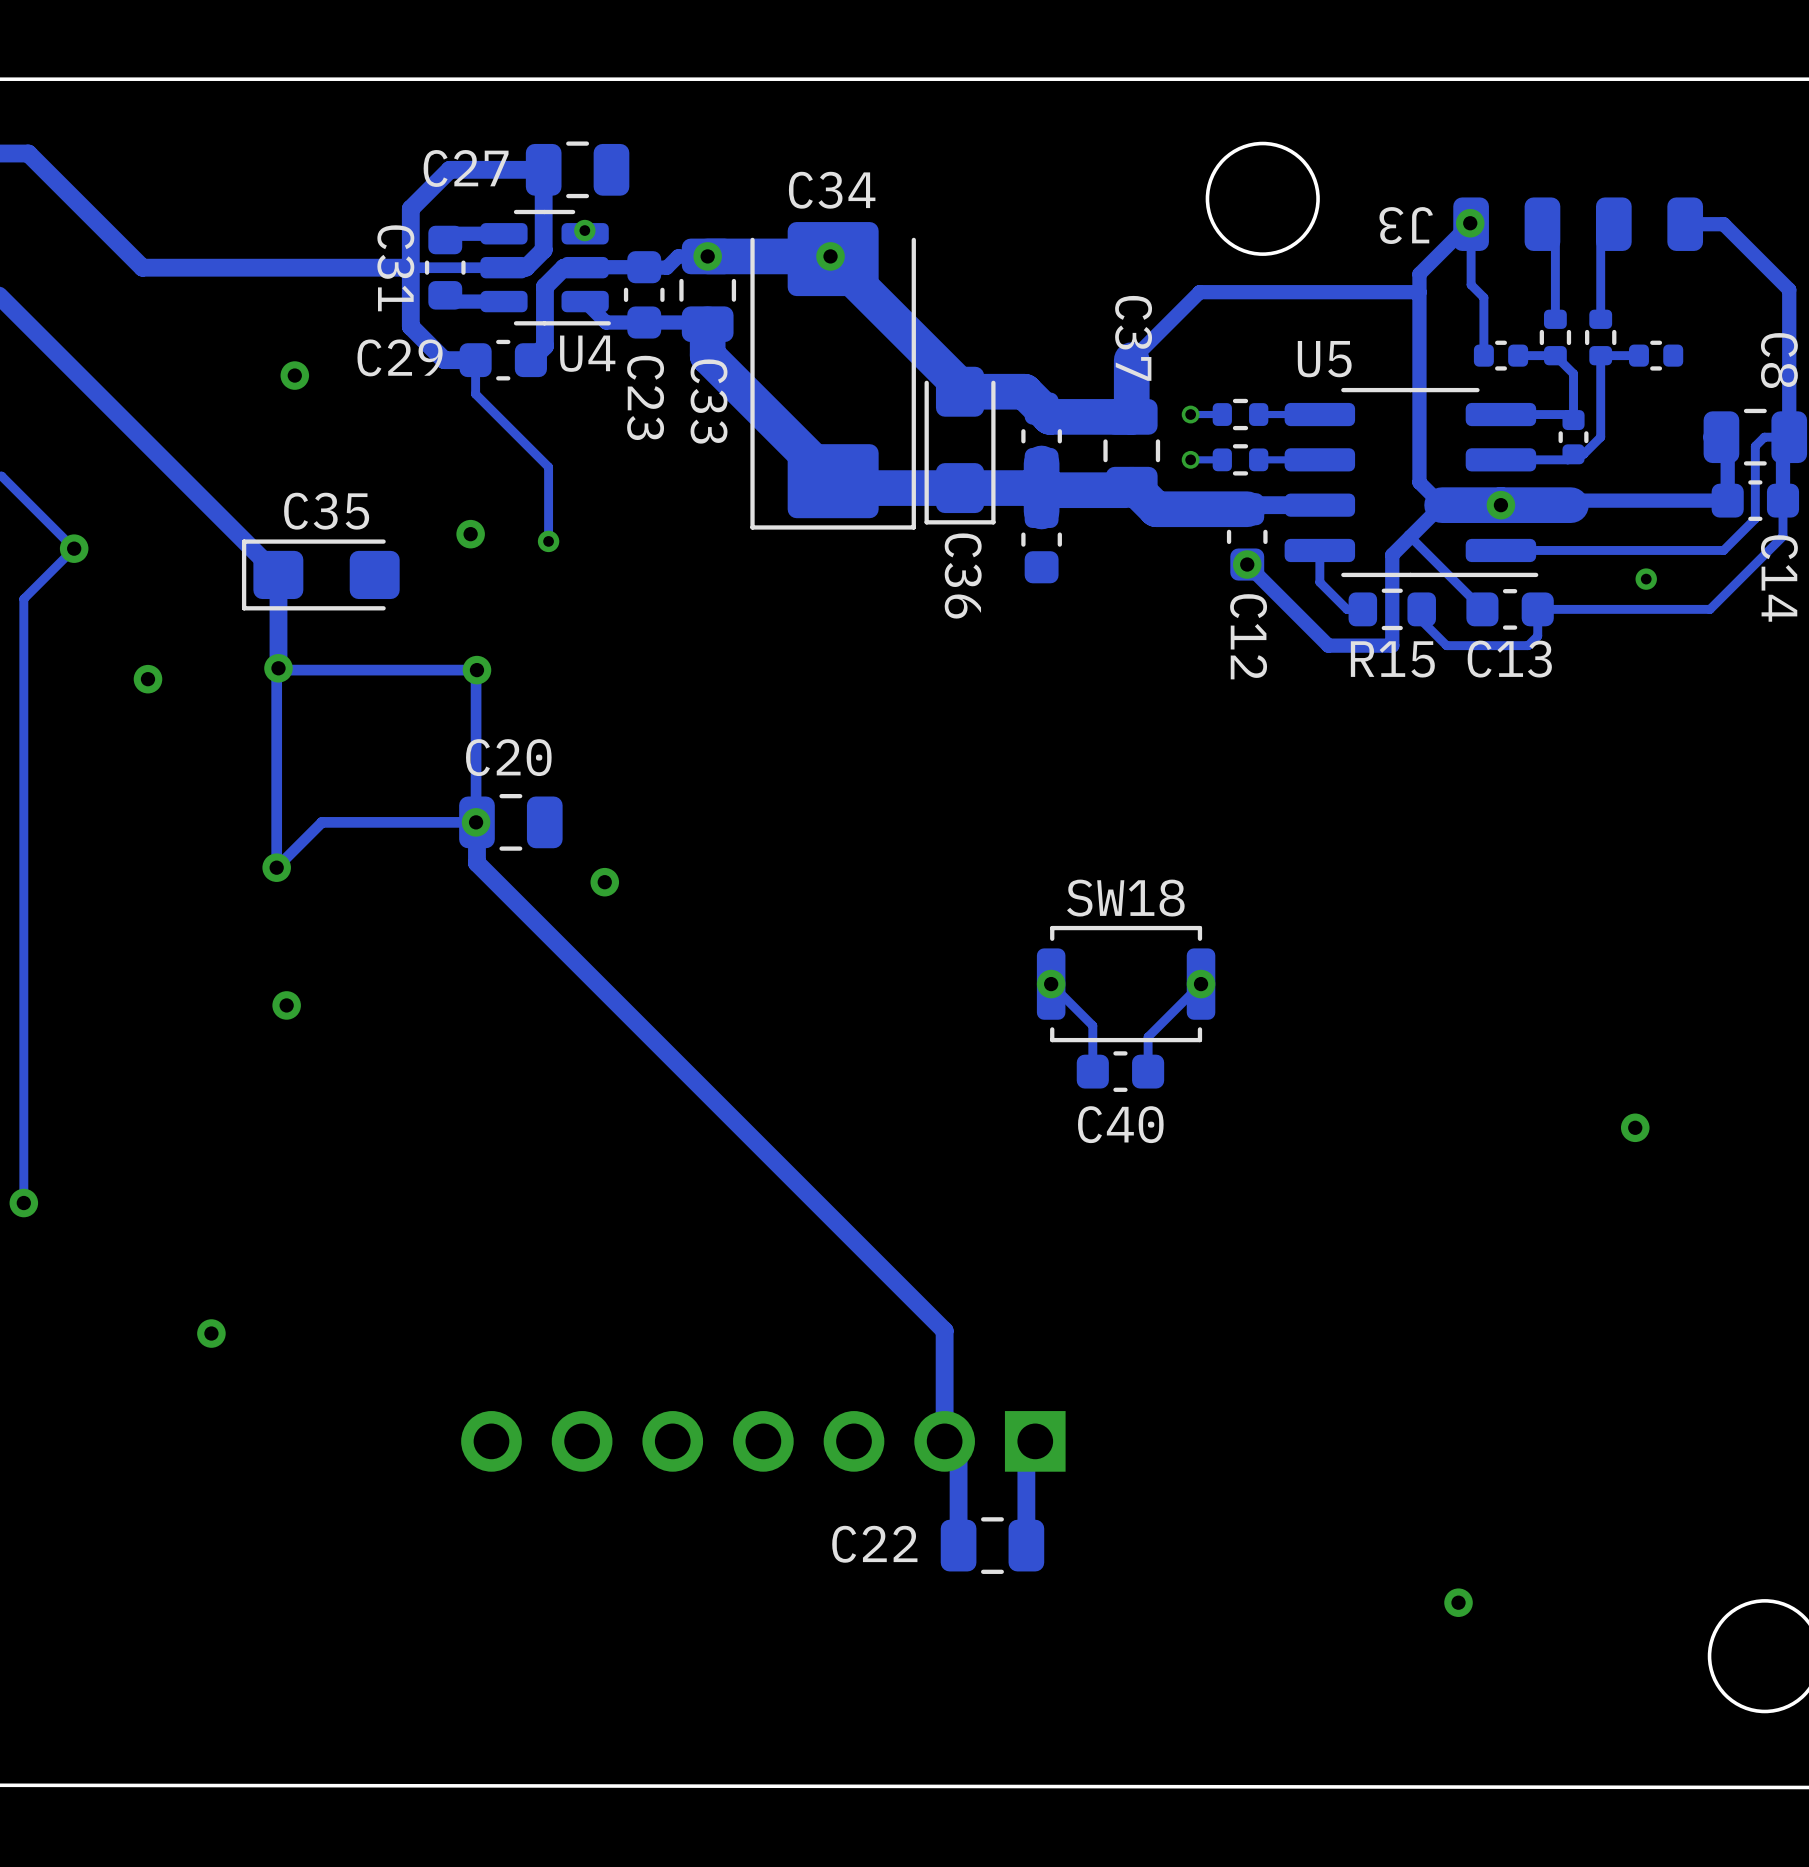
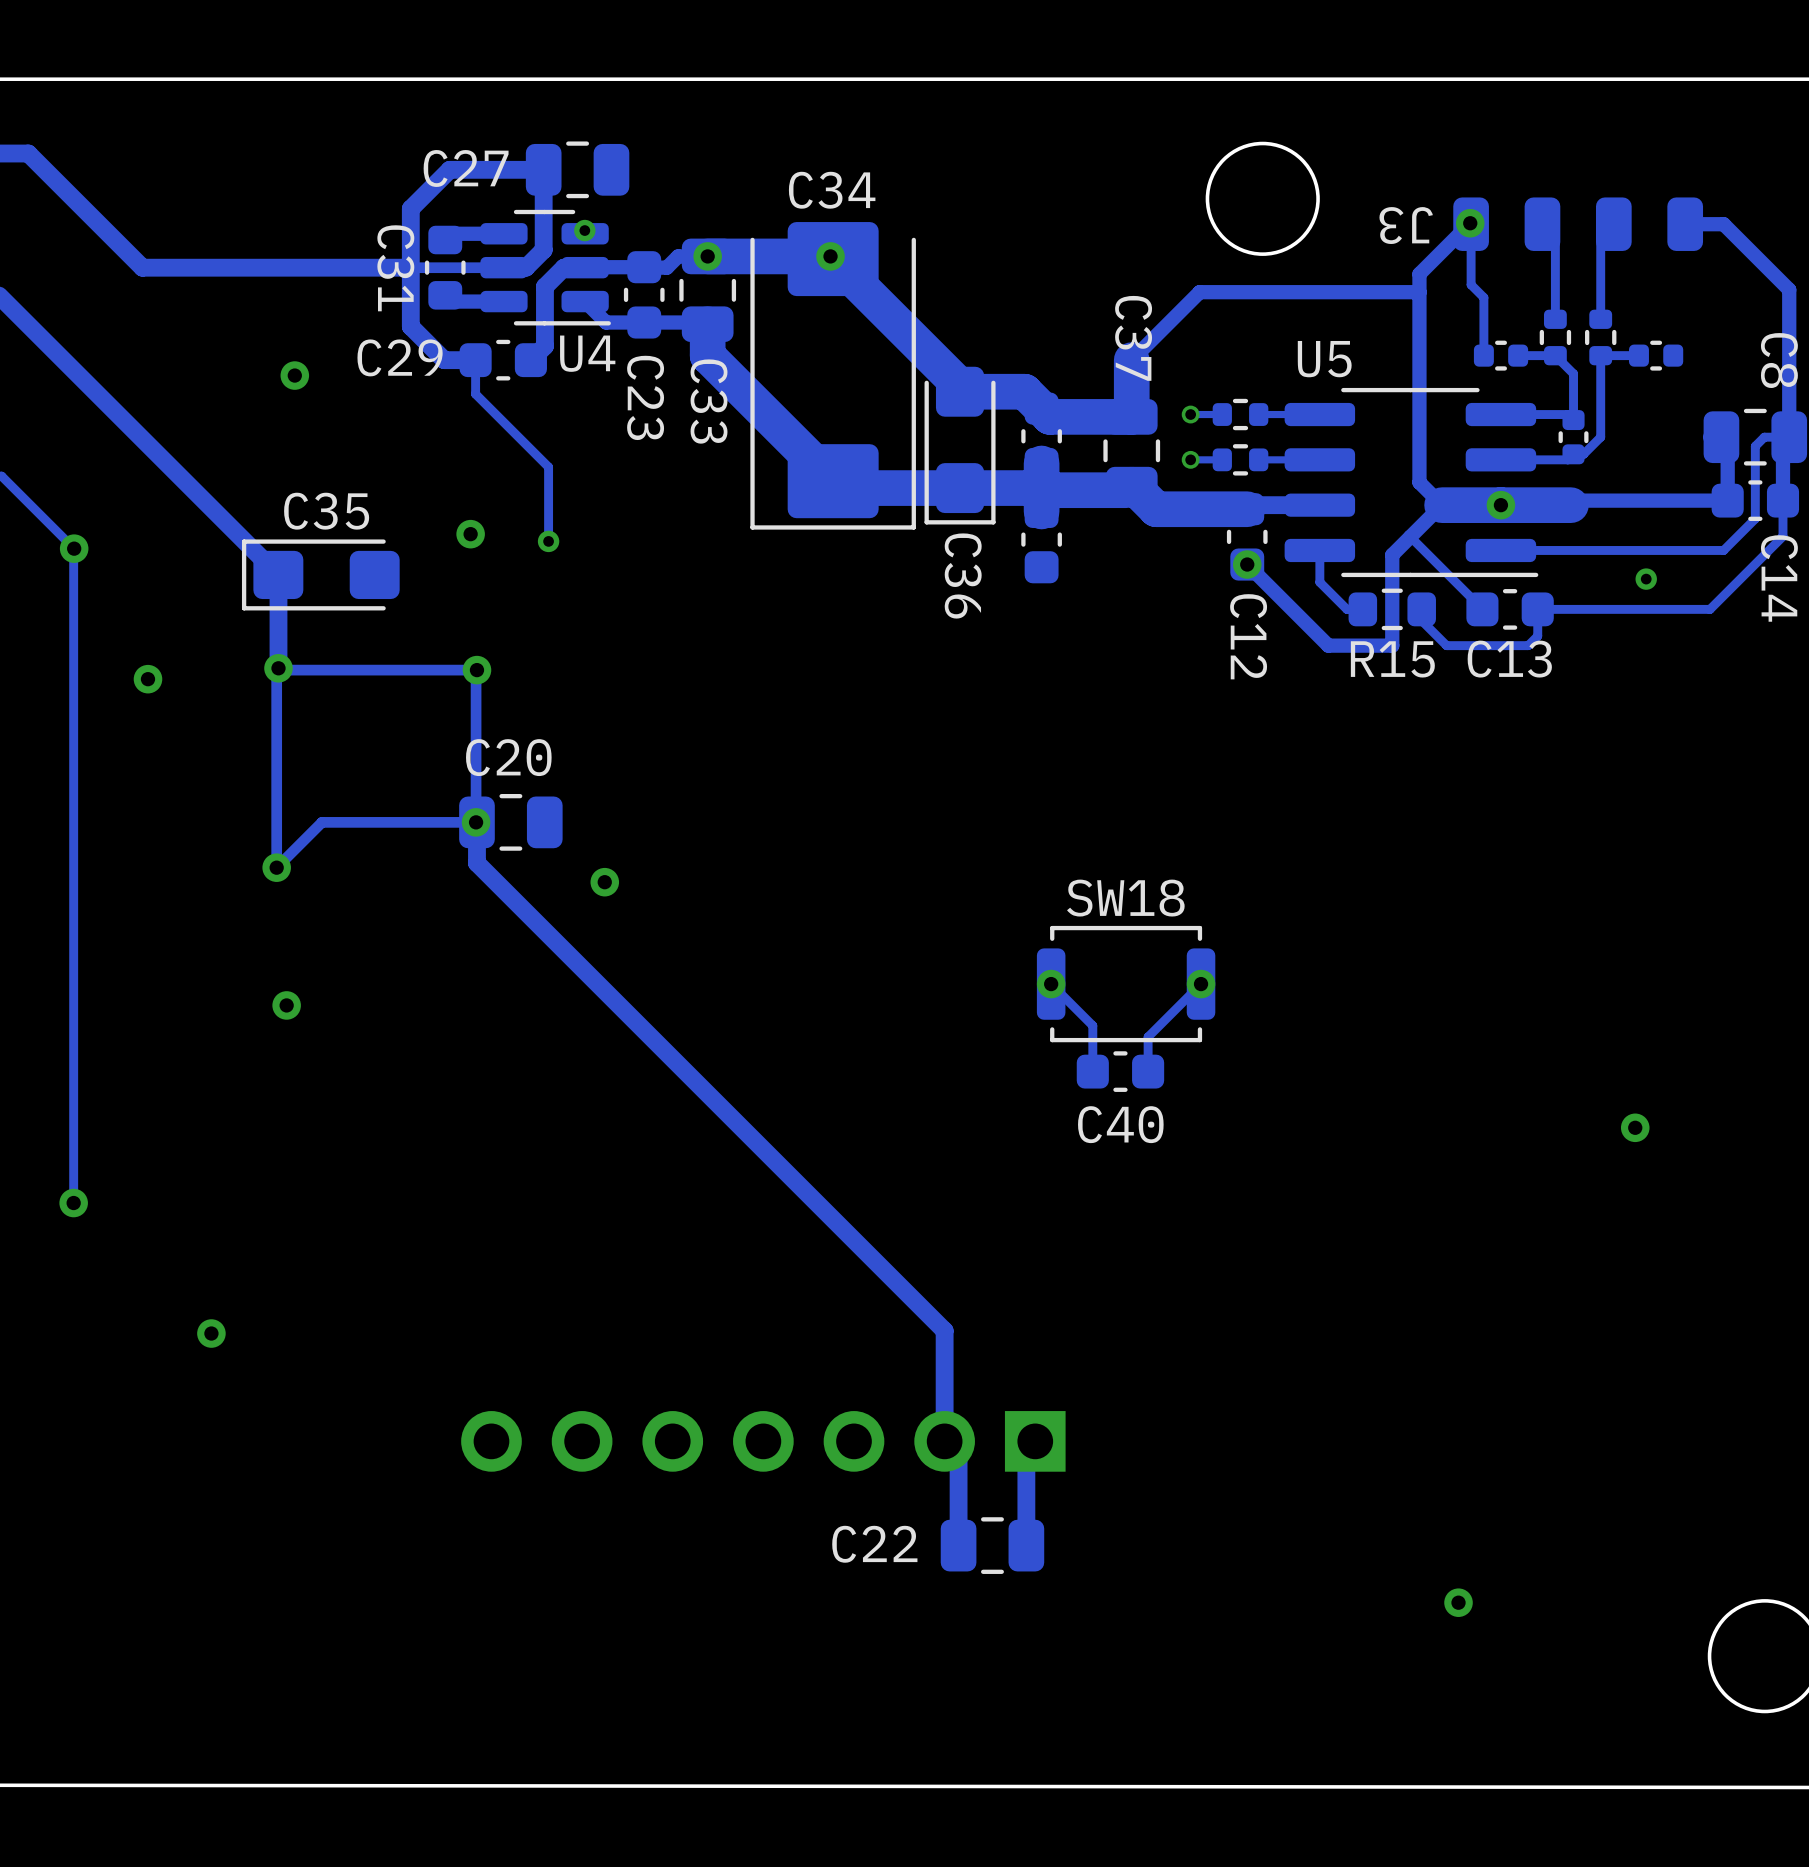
track: (73, 549) (23, 599) (23, 1203) -> (73, 549) (73, 1203)
via: (23, 1203) -> none
via: none -> (73, 1203)

